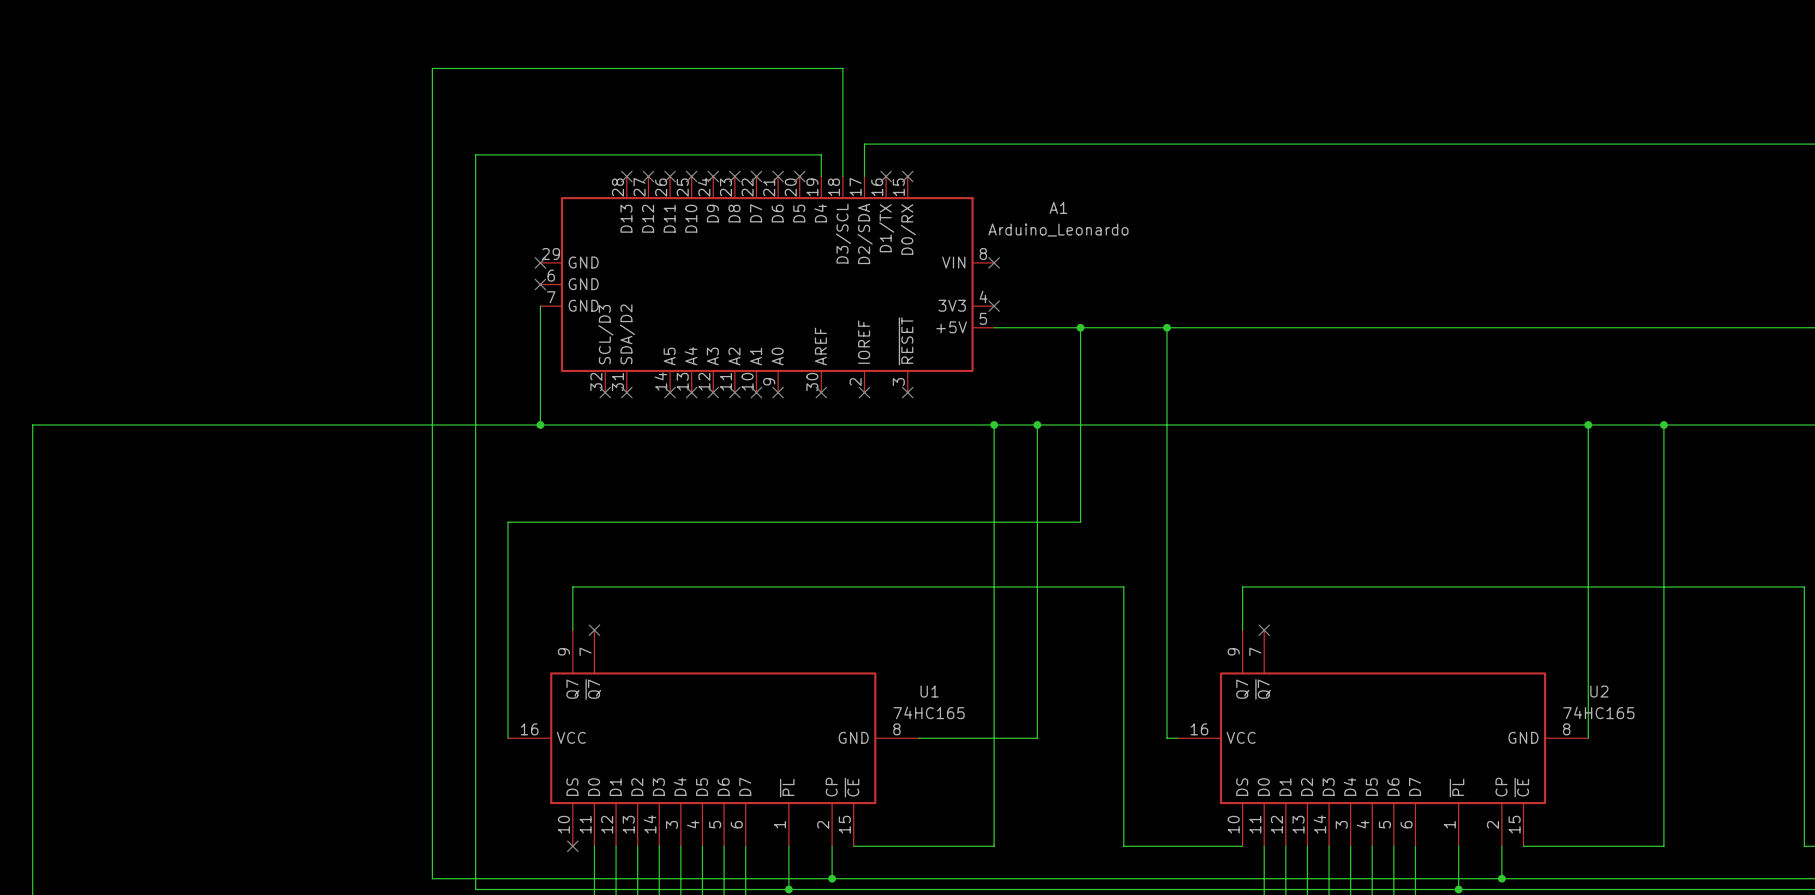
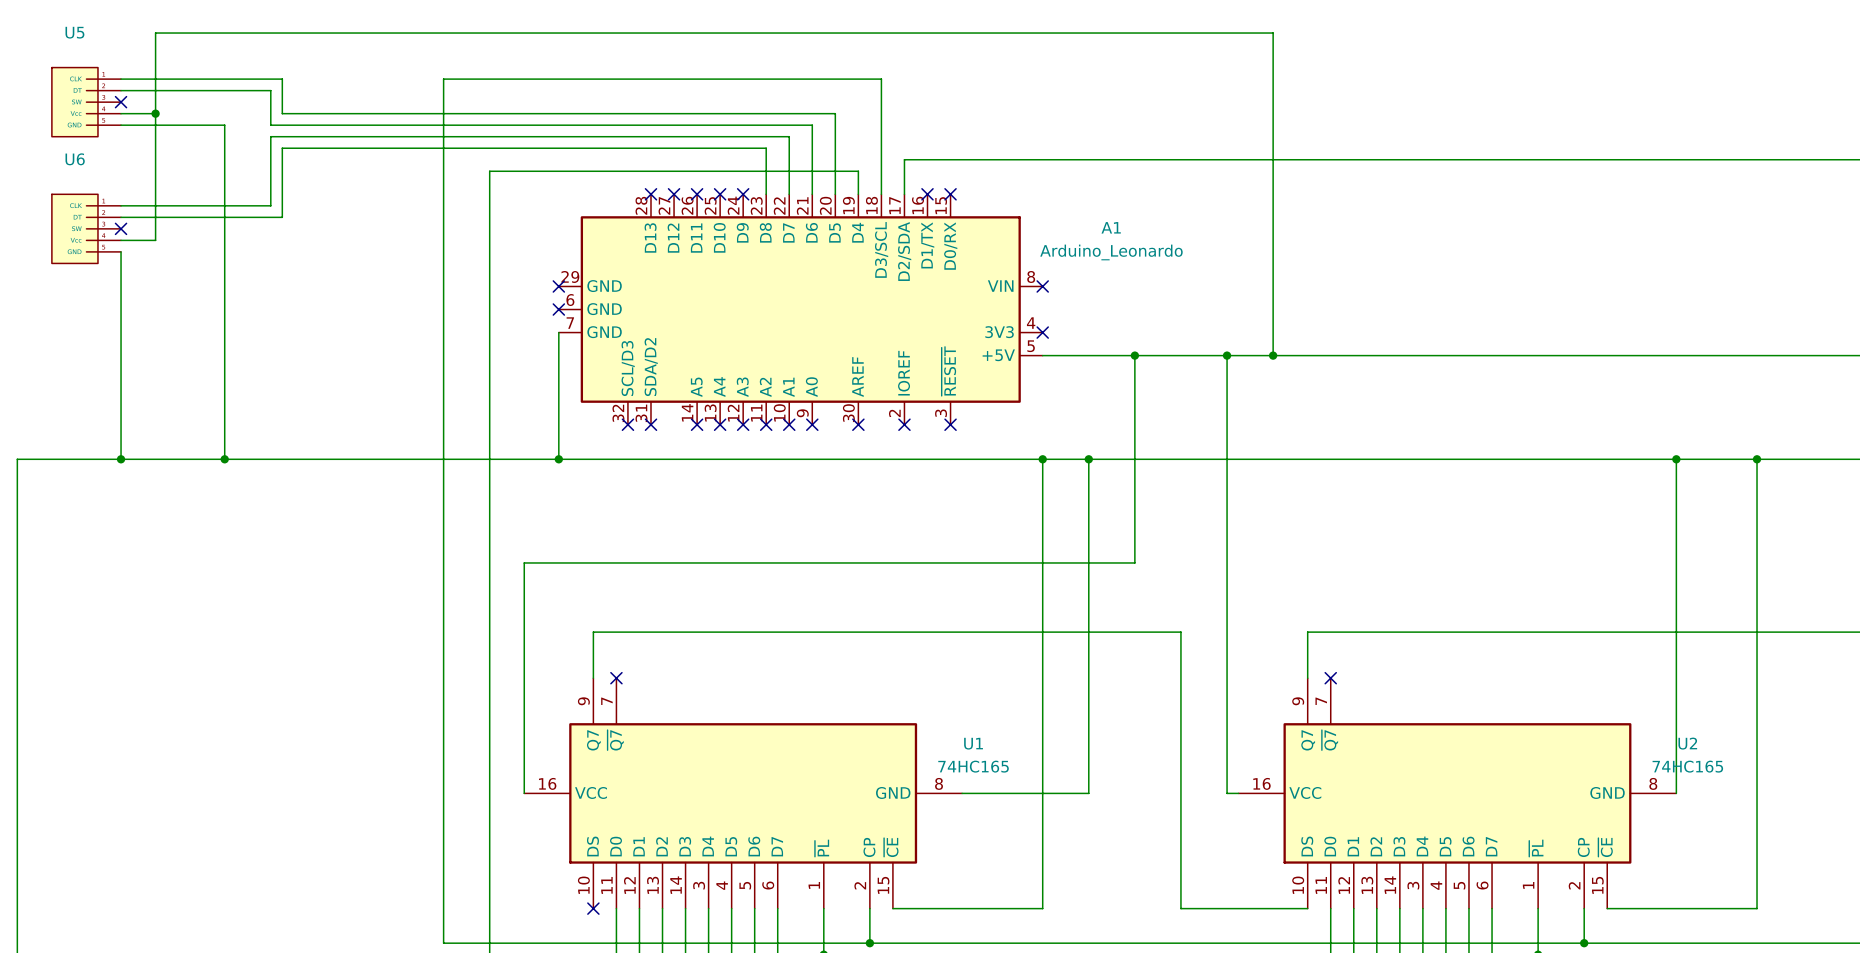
wire: none -> (121, 79) (282, 79) (282, 113) (835, 113) (835, 194)
wire: none -> (121, 90) (270, 90) (270, 125) (812, 125) (812, 194)
U5: none -> (86, 102)
no-connect mark: none -> (121, 102)
wire: none -> (121, 113) (155, 113)
junction: none -> (155, 113)
wire: none -> (121, 125) (224, 125) (224, 459)
wire: none -> (766, 194) (766, 148) (282, 148) (282, 217) (121, 217)
no-connect mark: (734, 176) -> none
wire: none -> (789, 194) (789, 136) (270, 136) (270, 205) (121, 205)
no-connect mark: (756, 176) -> none
no-connect mark: (778, 176) -> none
no-connect mark: (799, 176) -> none
U6: none -> (86, 228)
no-connect mark: none -> (121, 228)
wire: none -> (121, 240) (155, 240) (155, 33) (1273, 33) (1273, 355)
wire: none -> (121, 251) (121, 459)
junction: none -> (1273, 355)
junction: none -> (121, 459)
junction: none -> (224, 459)

